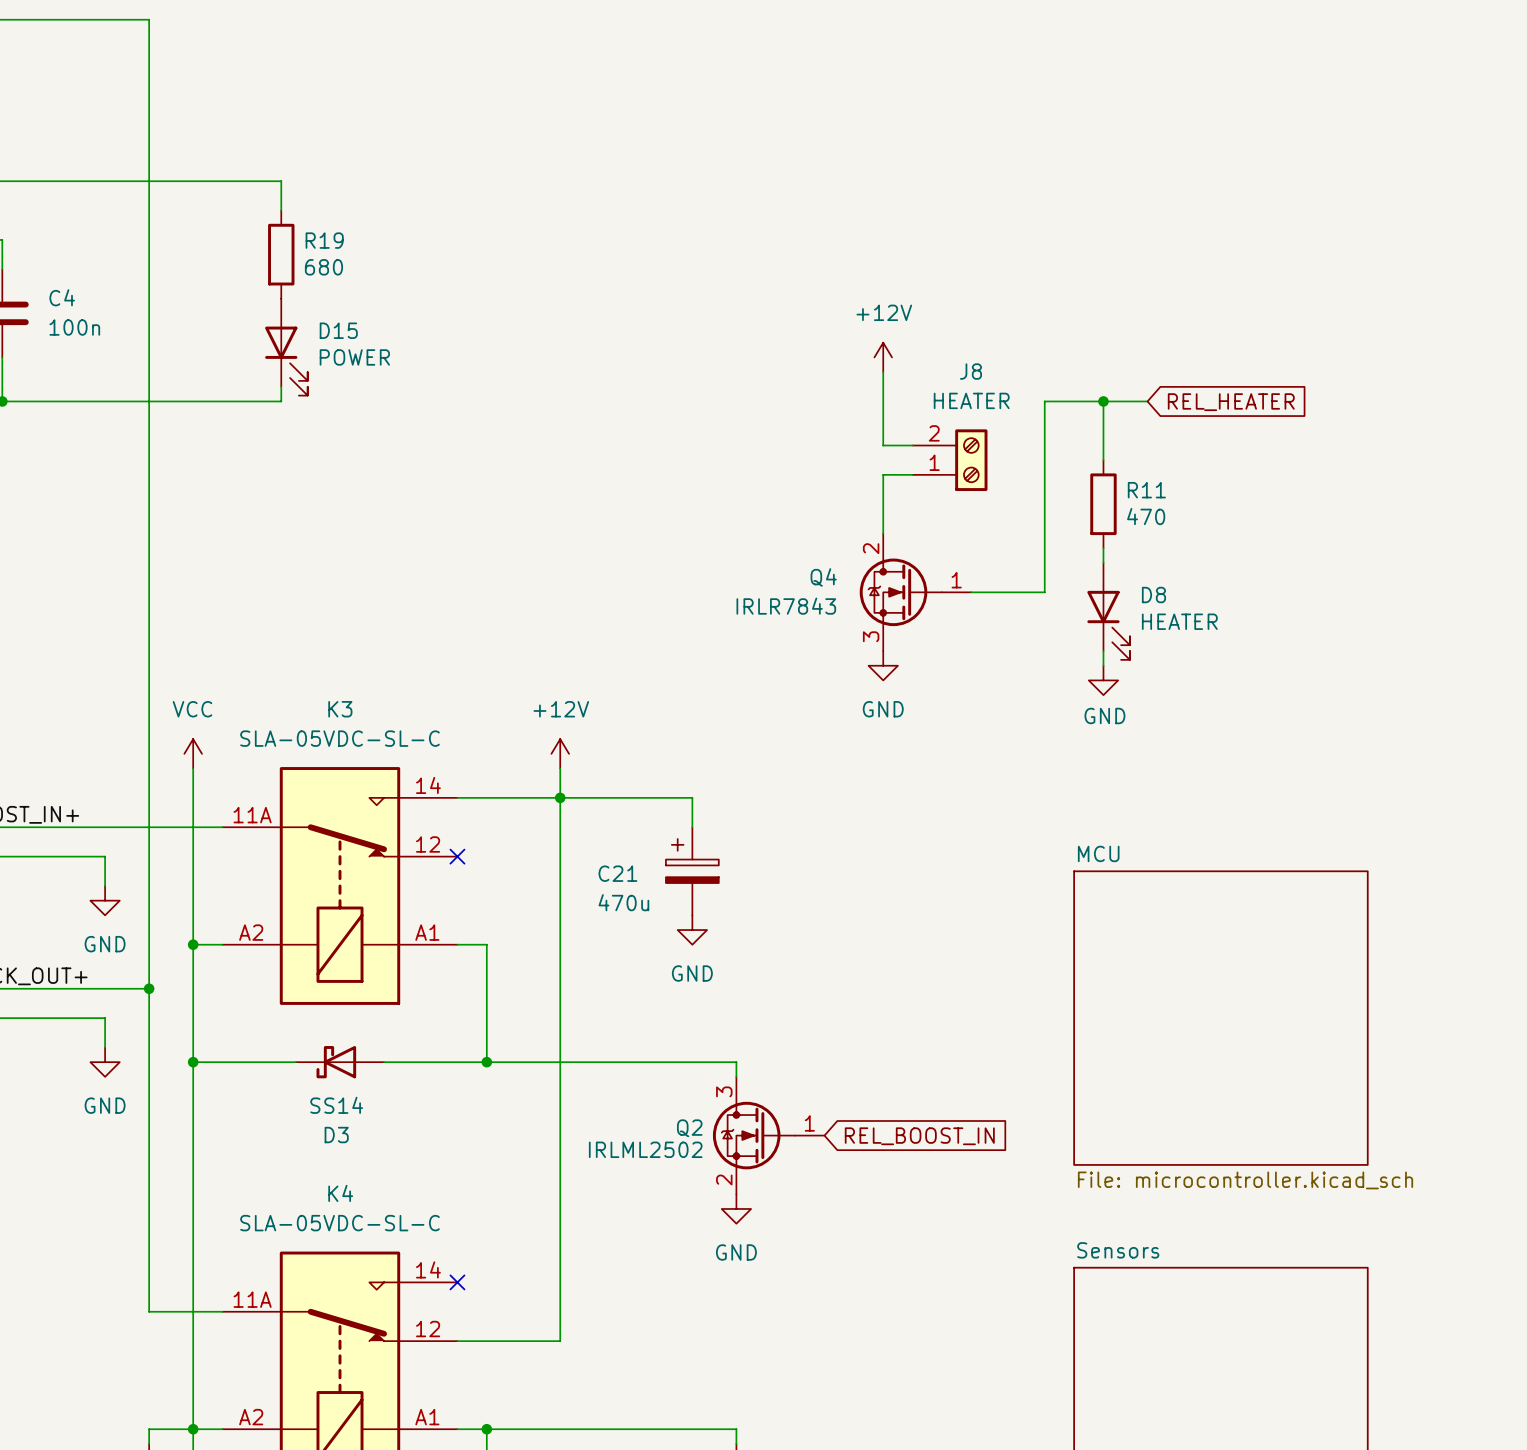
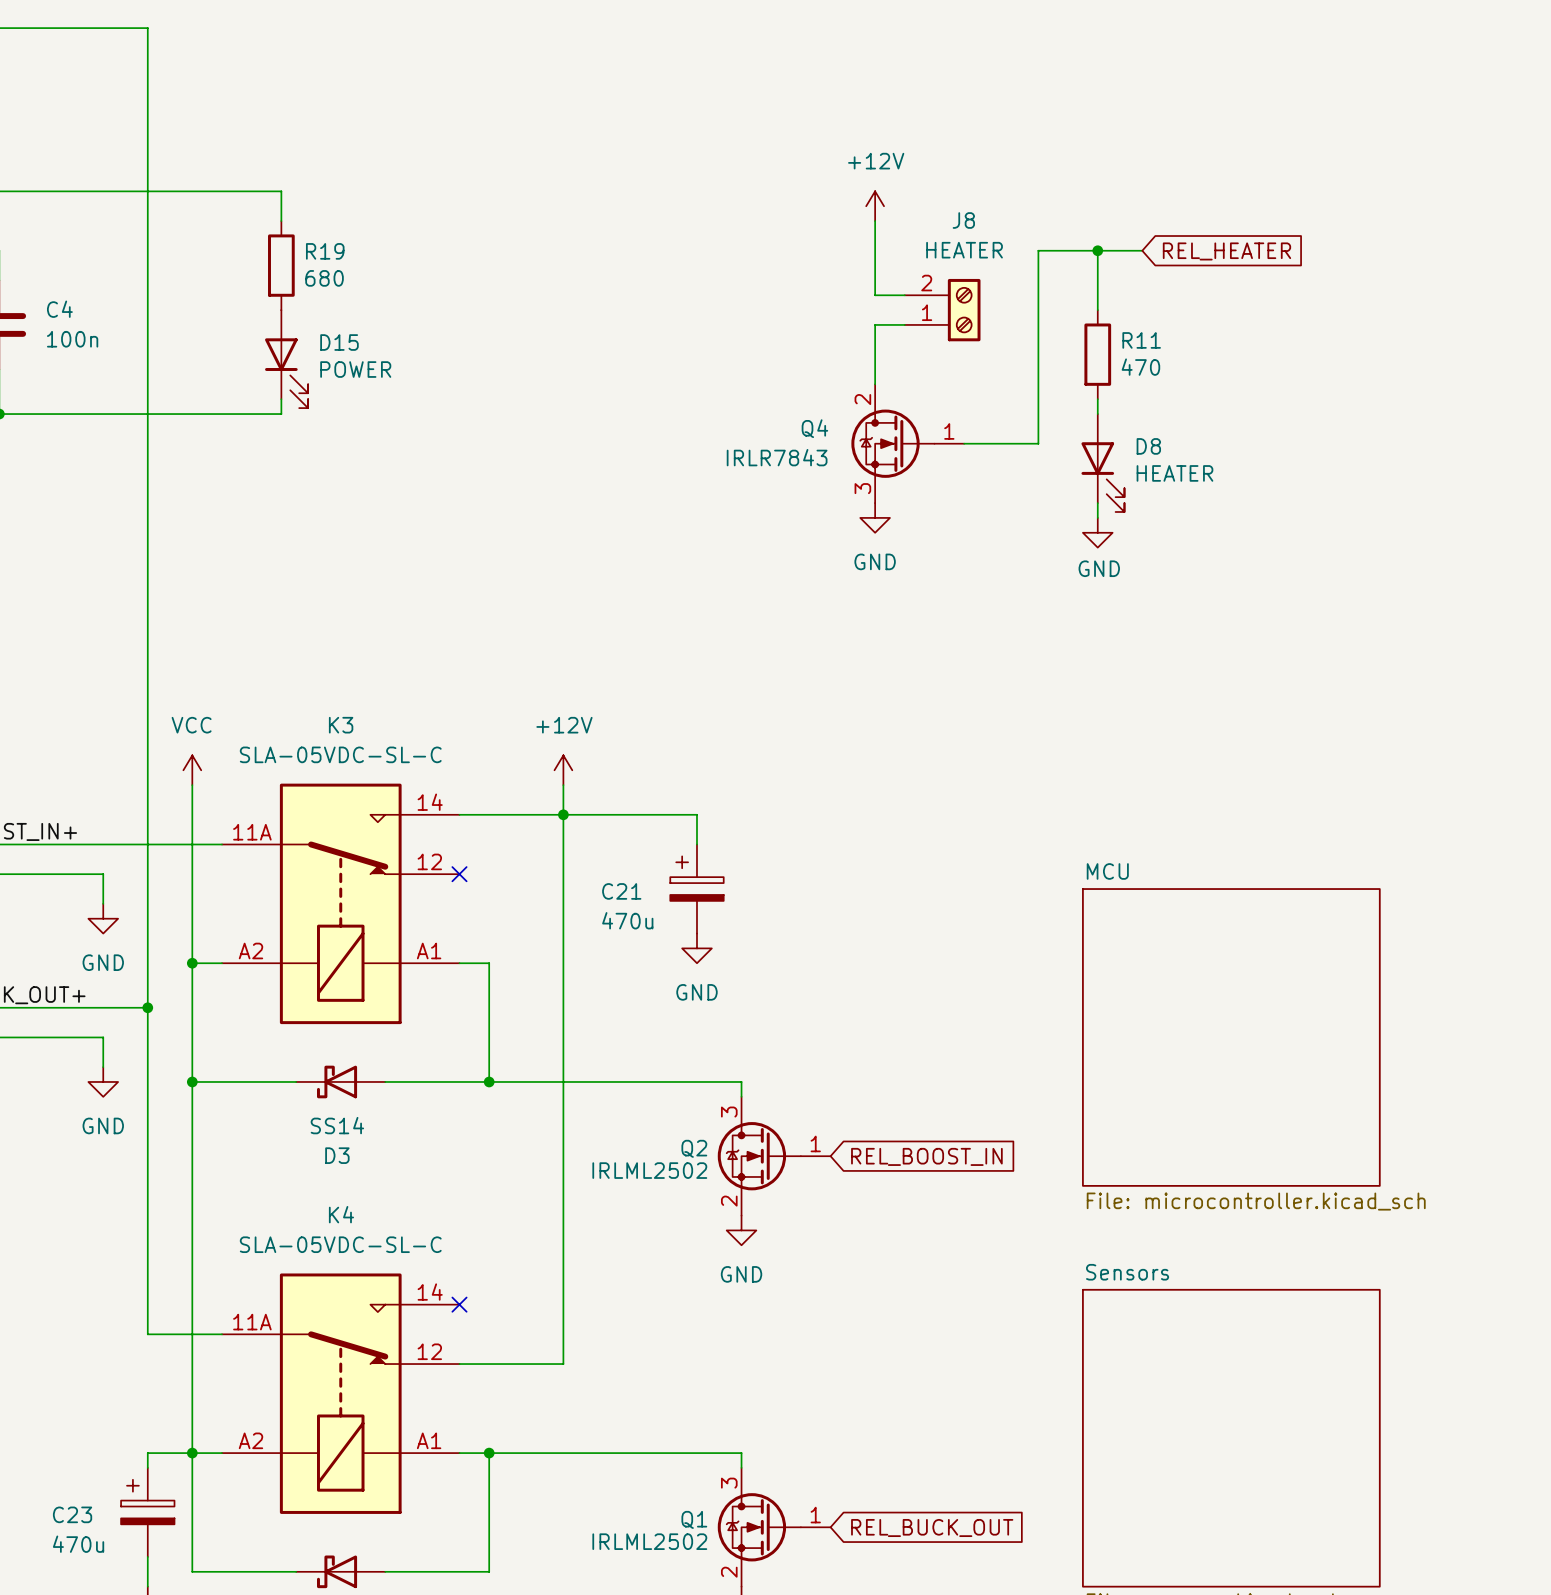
junction: none -> (1097, 250)
power symbol position: +12V (883, 357) -> +12V (875, 206)
wire: (883, 372) (883, 445) (912, 445) -> (875, 221) (875, 295) (904, 295)
wire: (1103, 401) (1103, 460) -> (1097, 250) (1097, 310)
junction: (1103, 401) -> none
wire: (1147, 401) (1044, 401) (1044, 592) (971, 592) -> (1142, 250) (1038, 250) (1038, 443) (964, 443)
global label position: REL_HEATER (1231, 402) -> REL_HEATER (1226, 251)
J8 position: (950, 460) -> (942, 310)
wire: (912, 474) (883, 474) (883, 533) -> (904, 324) (875, 324) (875, 384)
power symbol: none -> GND (875, 517)
R11 position: (1103, 504) -> (1097, 354)
power symbol: none -> GND (1097, 532)
wire: (1103, 548) (1103, 562) -> (1097, 399) (1097, 414)
Q4 position: (915, 592) -> (907, 443)
D8 position: (1108, 611) -> (1102, 463)
wire: (1103, 651) (1103, 665) -> (1097, 503) (1097, 517)
power symbol: GND (883, 665) -> none
power symbol: GND (1103, 680) -> none

